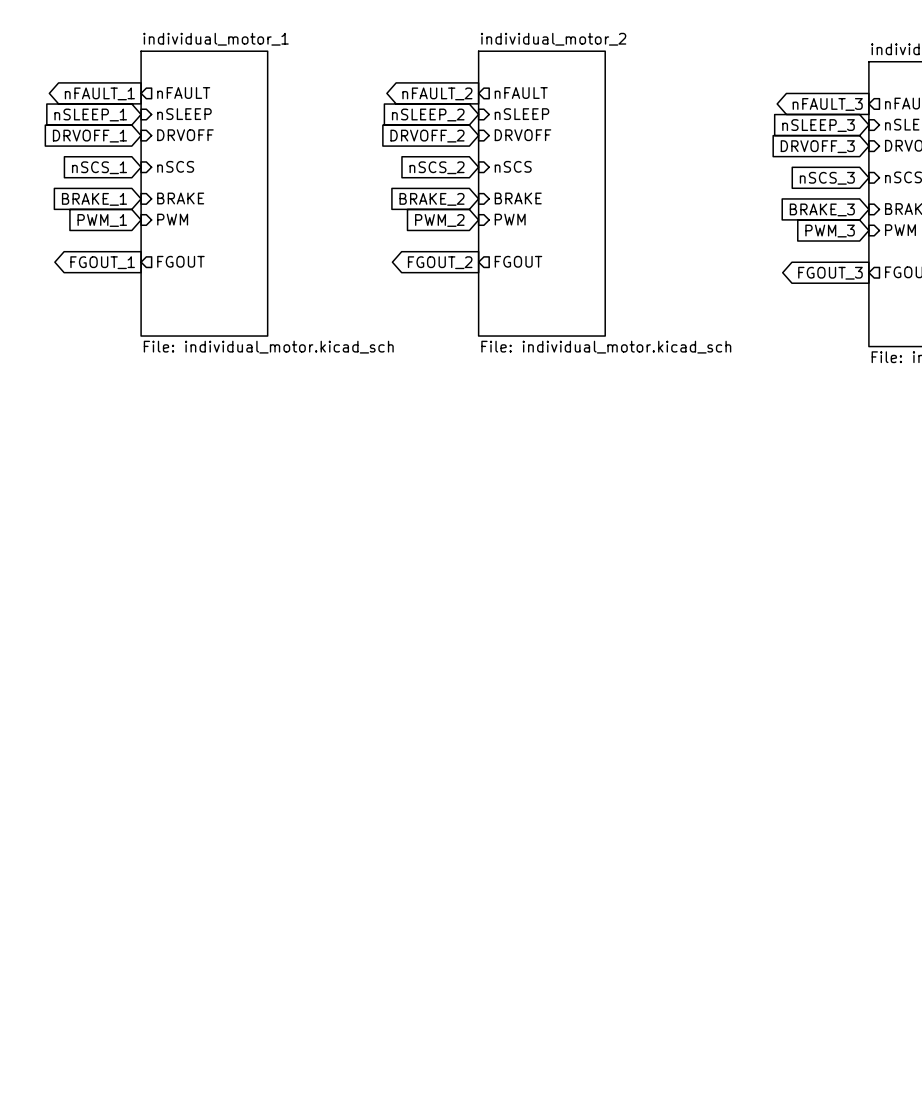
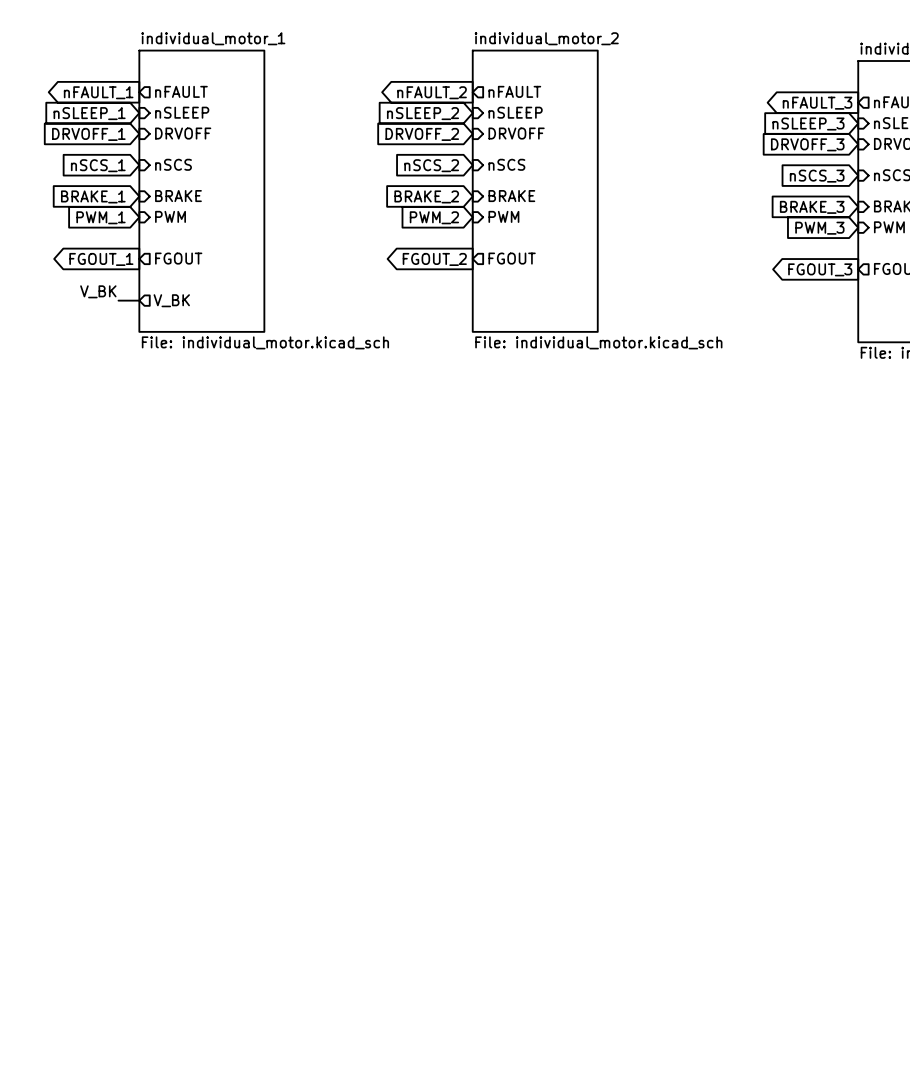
label: none -> V_BK (98, 291)
wire: none -> (118, 300) (139, 300)
sheet pin: none -> V_BK (171, 300)

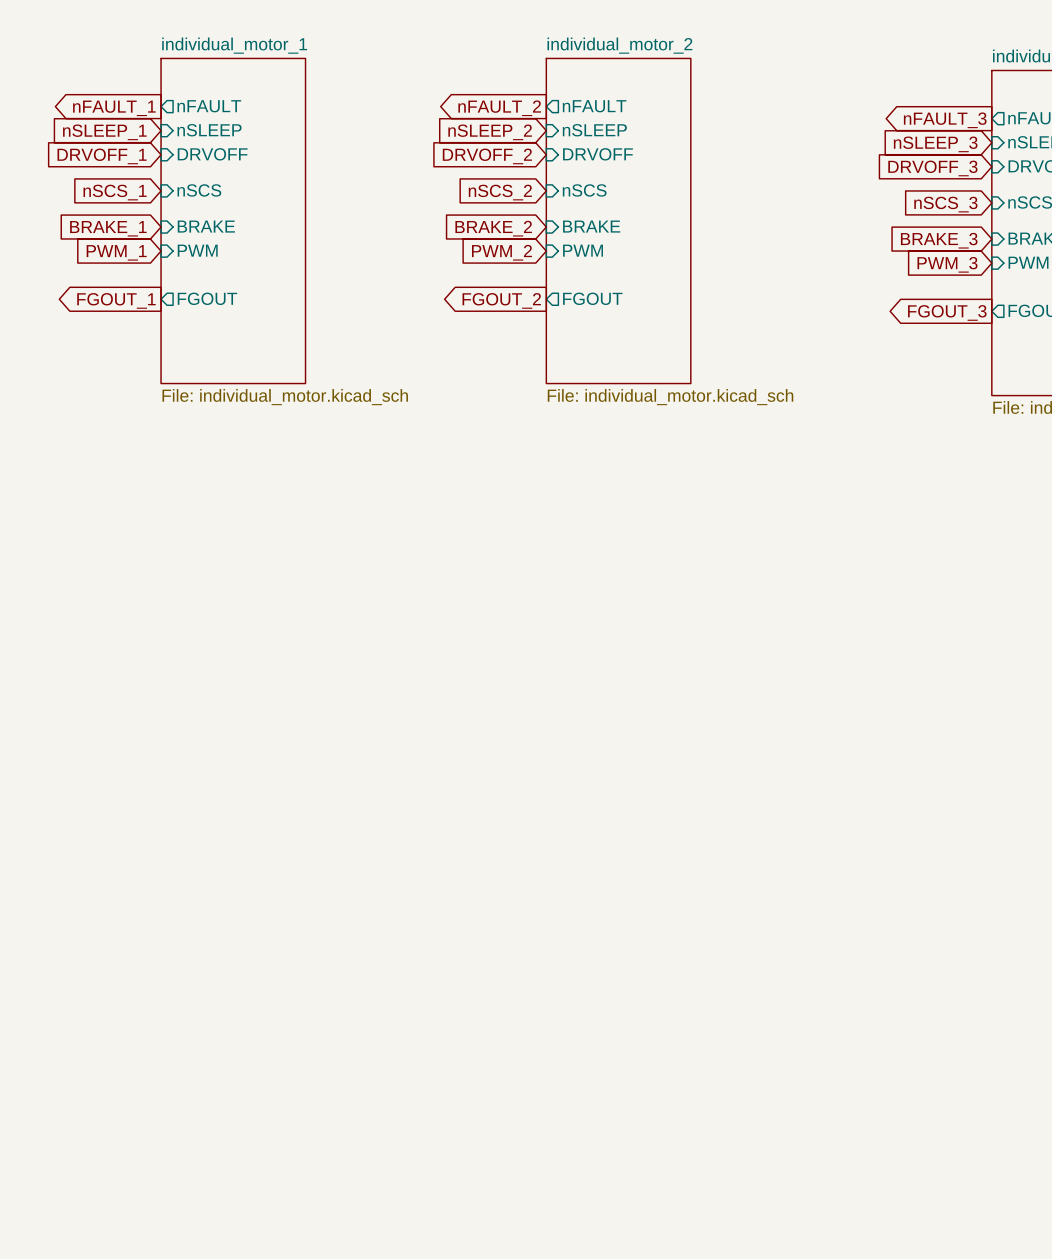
label: V_BK (98, 291) -> none
wire: (118, 300) (139, 300) -> none
sheet pin: V_BK (171, 300) -> none

